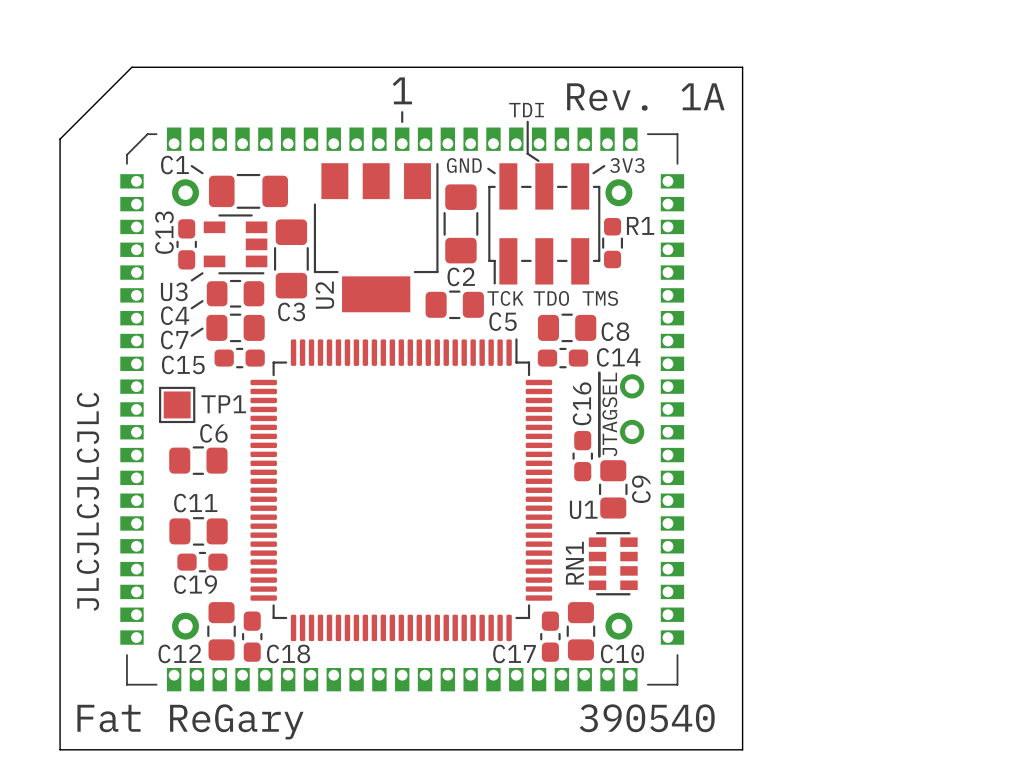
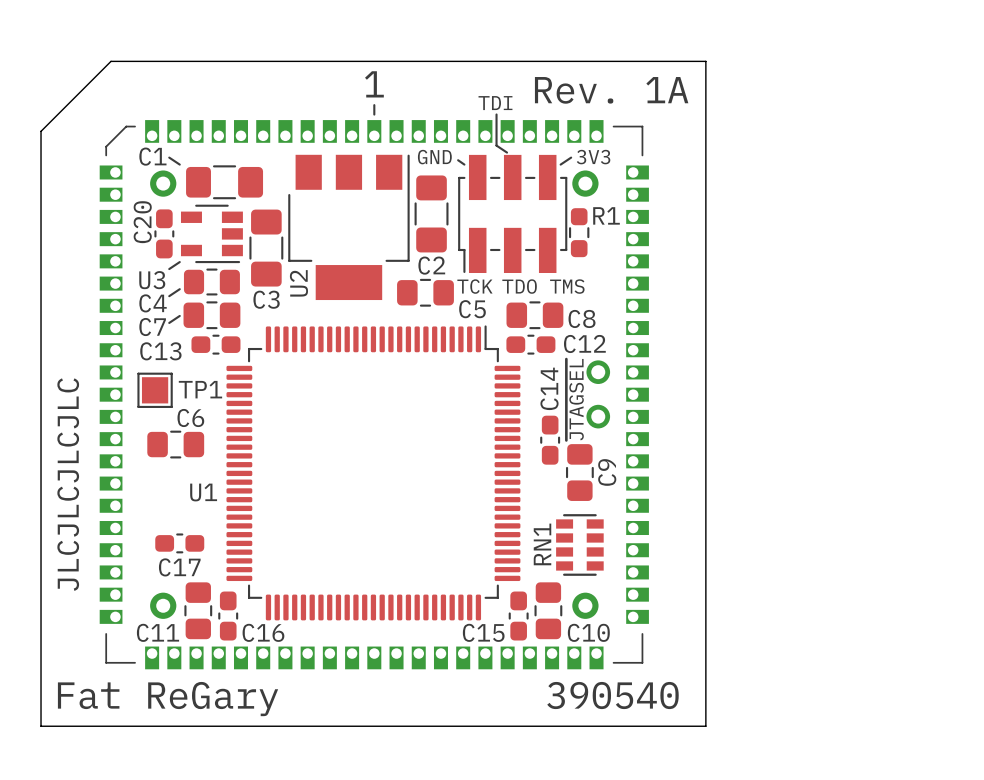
C13 name: C13 (164, 232) -> C20 (142, 222)
C14 name: C14 (618, 357) -> C12 (584, 343)
C15 name: C15 (183, 364) -> C13 (160, 351)
C16 name: C16 (582, 403) -> C14 (549, 388)
U1 name position: U1 (583, 509) -> U1 (203, 492)
C11: (198, 531) -> none
C19 name: C19 (195, 584) -> C17 (179, 567)
C12 name: C12 (179, 653) -> C11 (158, 632)
C18 name: C18 (288, 653) -> C16 (263, 632)
C17 name: C17 (514, 653) -> C15 (483, 632)

